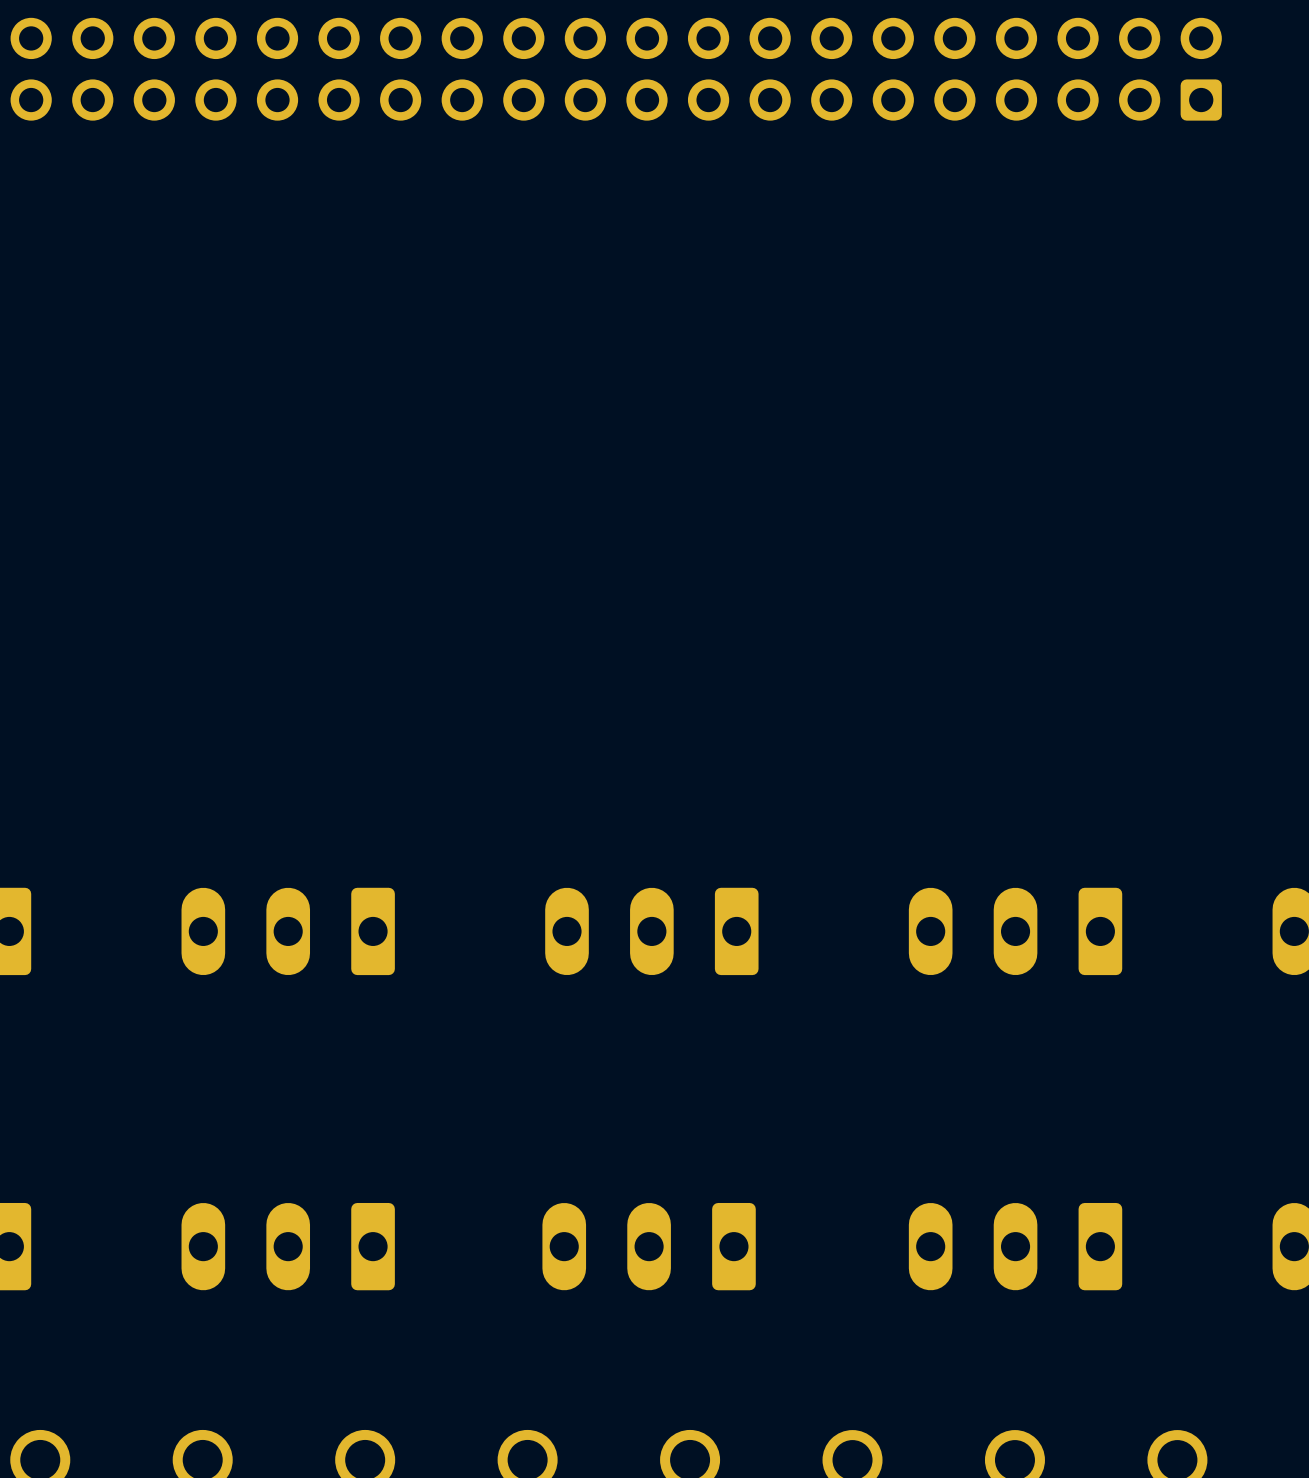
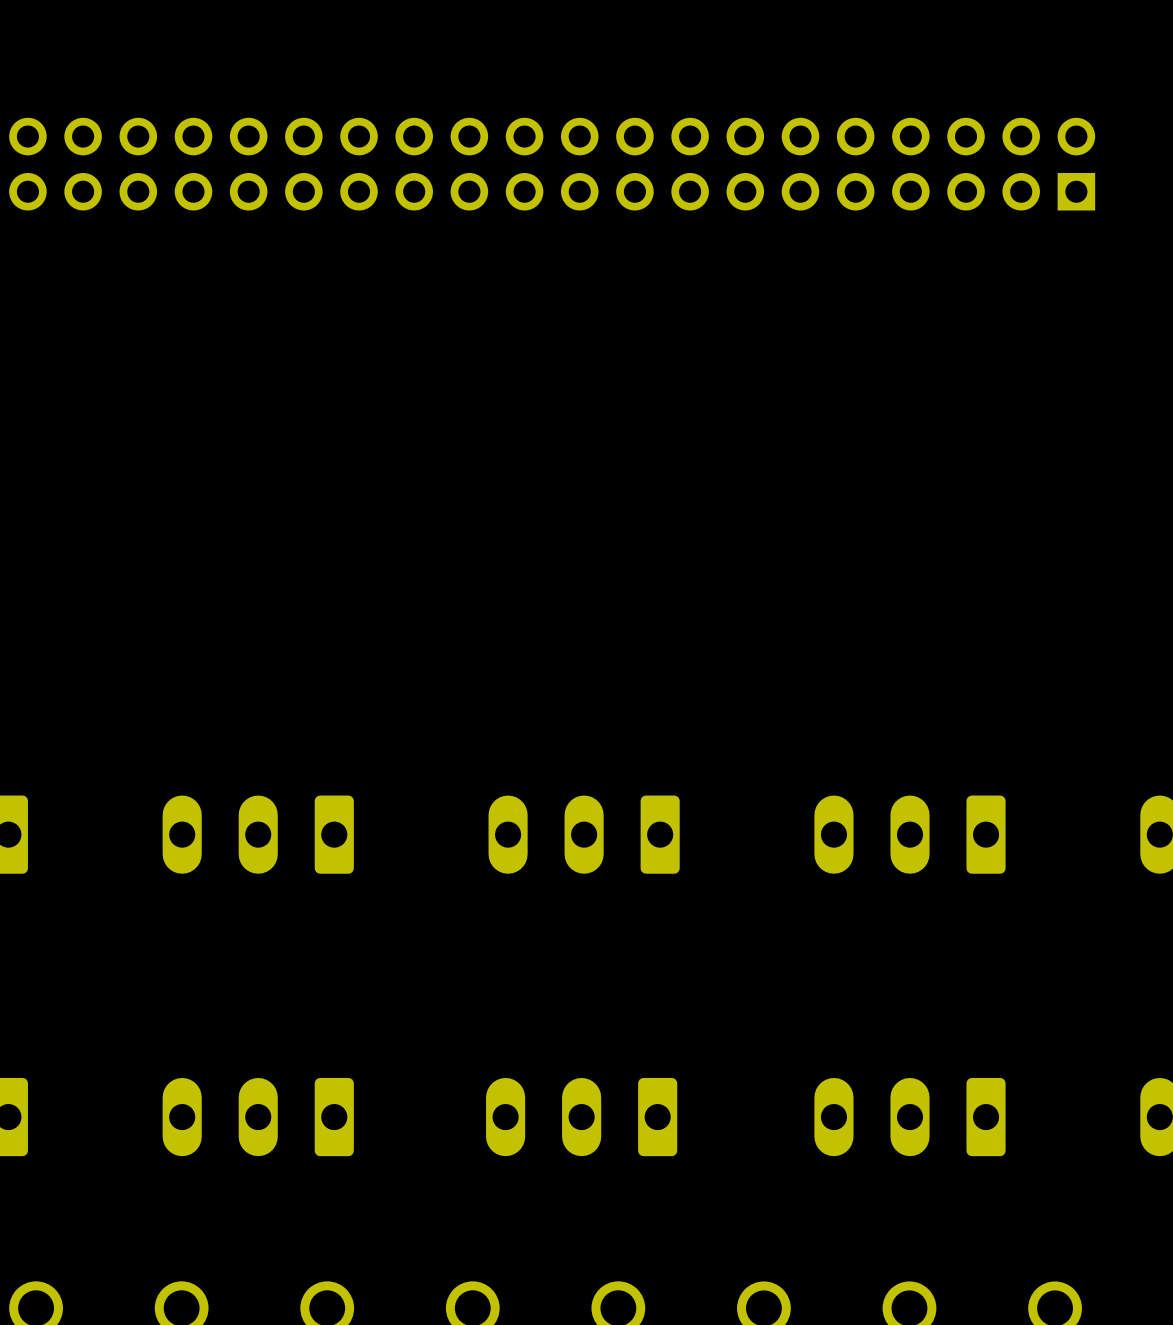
part: (616, 69) -> none
part: none -> (552, 164)

